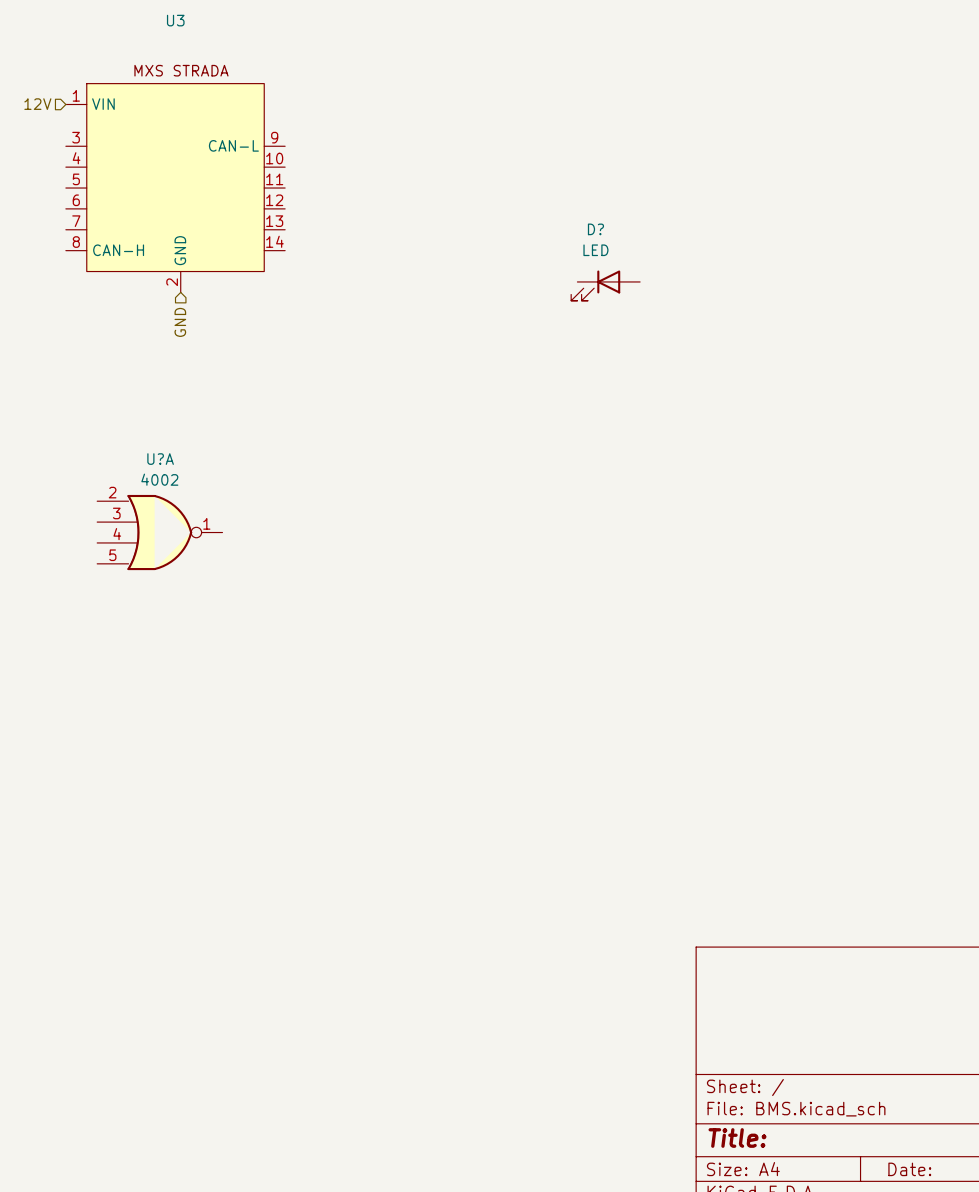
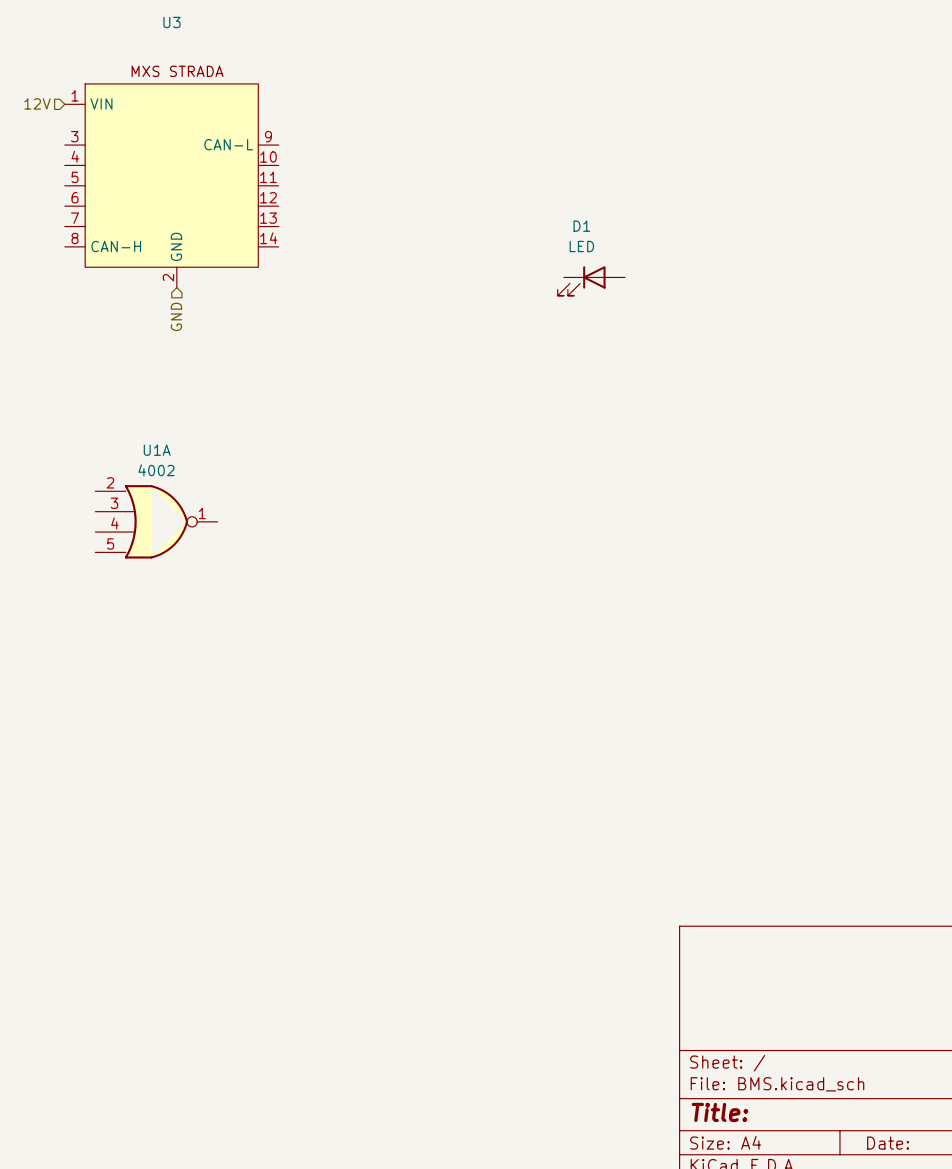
D? name: D? (595, 229) -> D1 (581, 226)
U?A name: U?A (160, 459) -> U1A (157, 450)

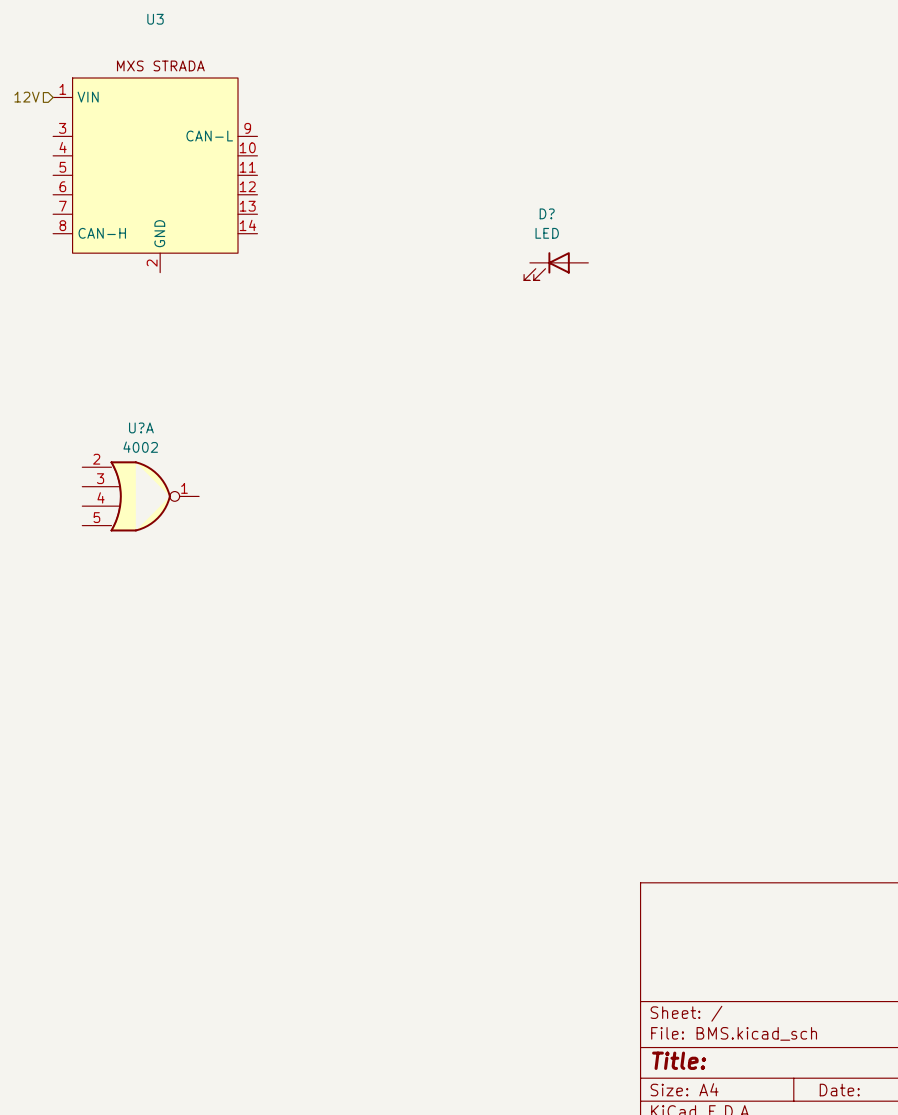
D1 name: D1 (581, 226) -> D? (547, 213)
hierarchical label: GND (176, 316) -> none
U1A name: U1A (157, 450) -> U?A (141, 427)

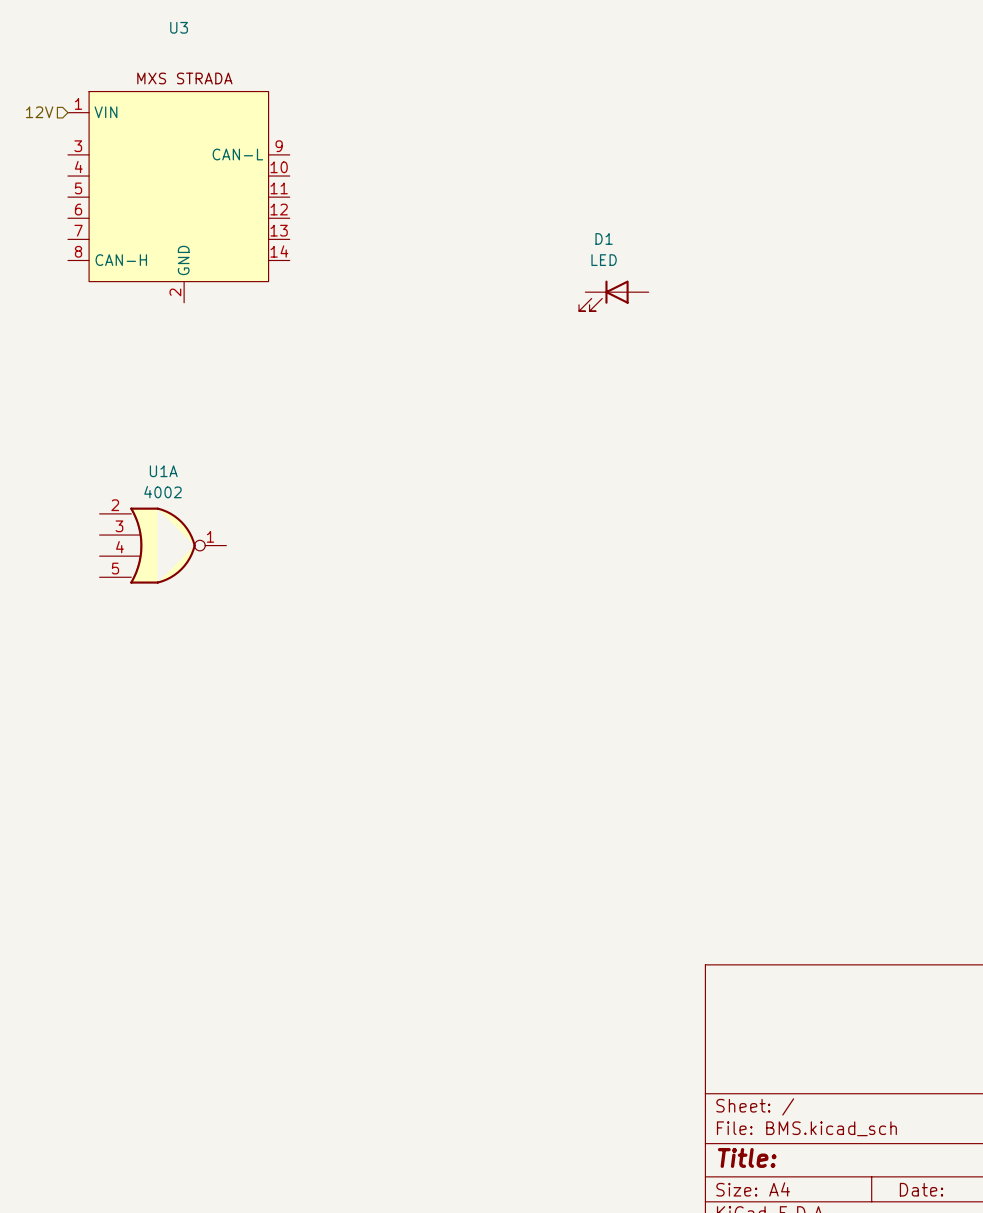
D? name: D? (547, 213) -> D1 (604, 238)
U?A name: U?A (141, 427) -> U1A (163, 471)

